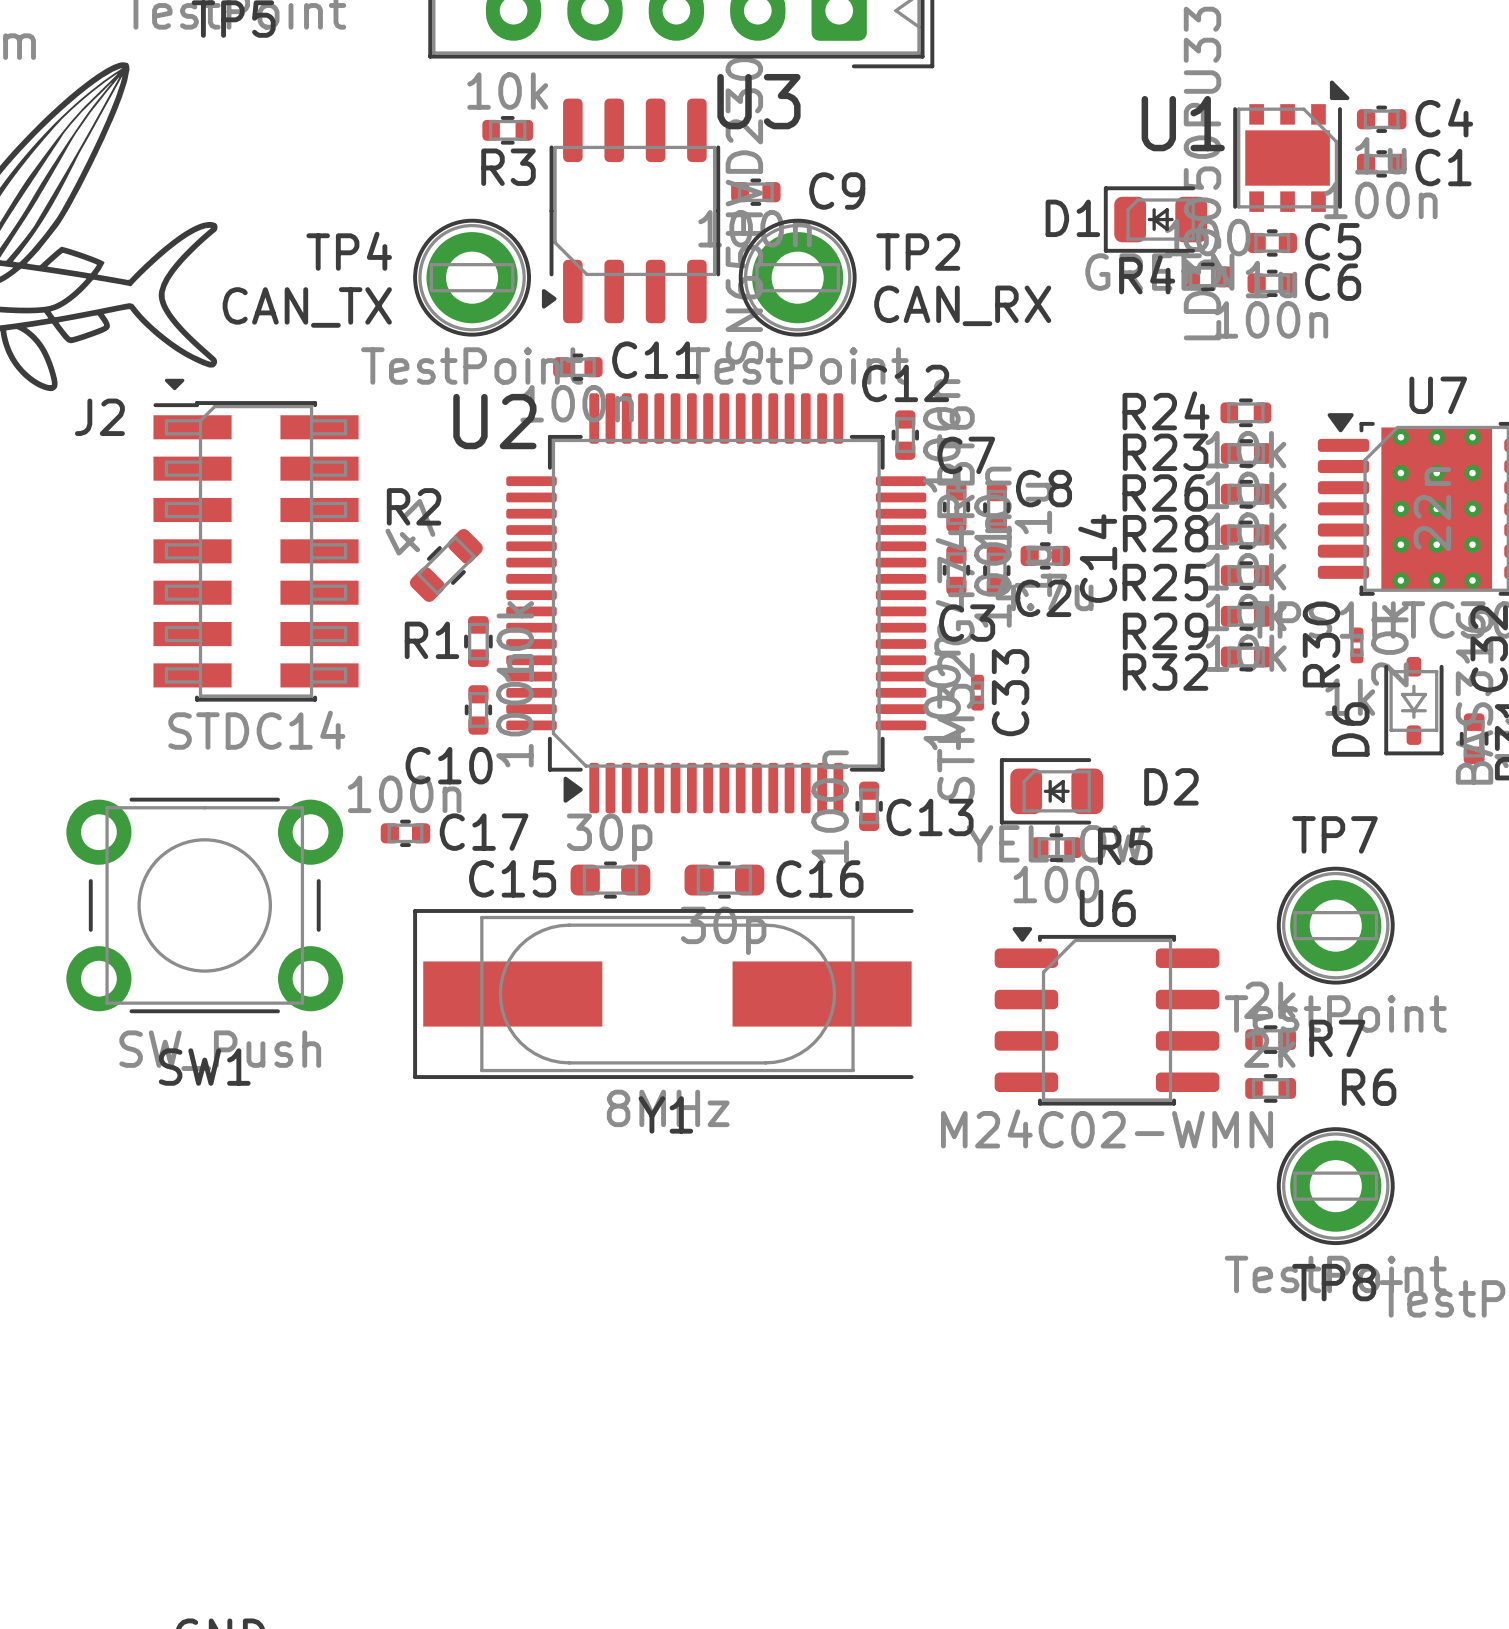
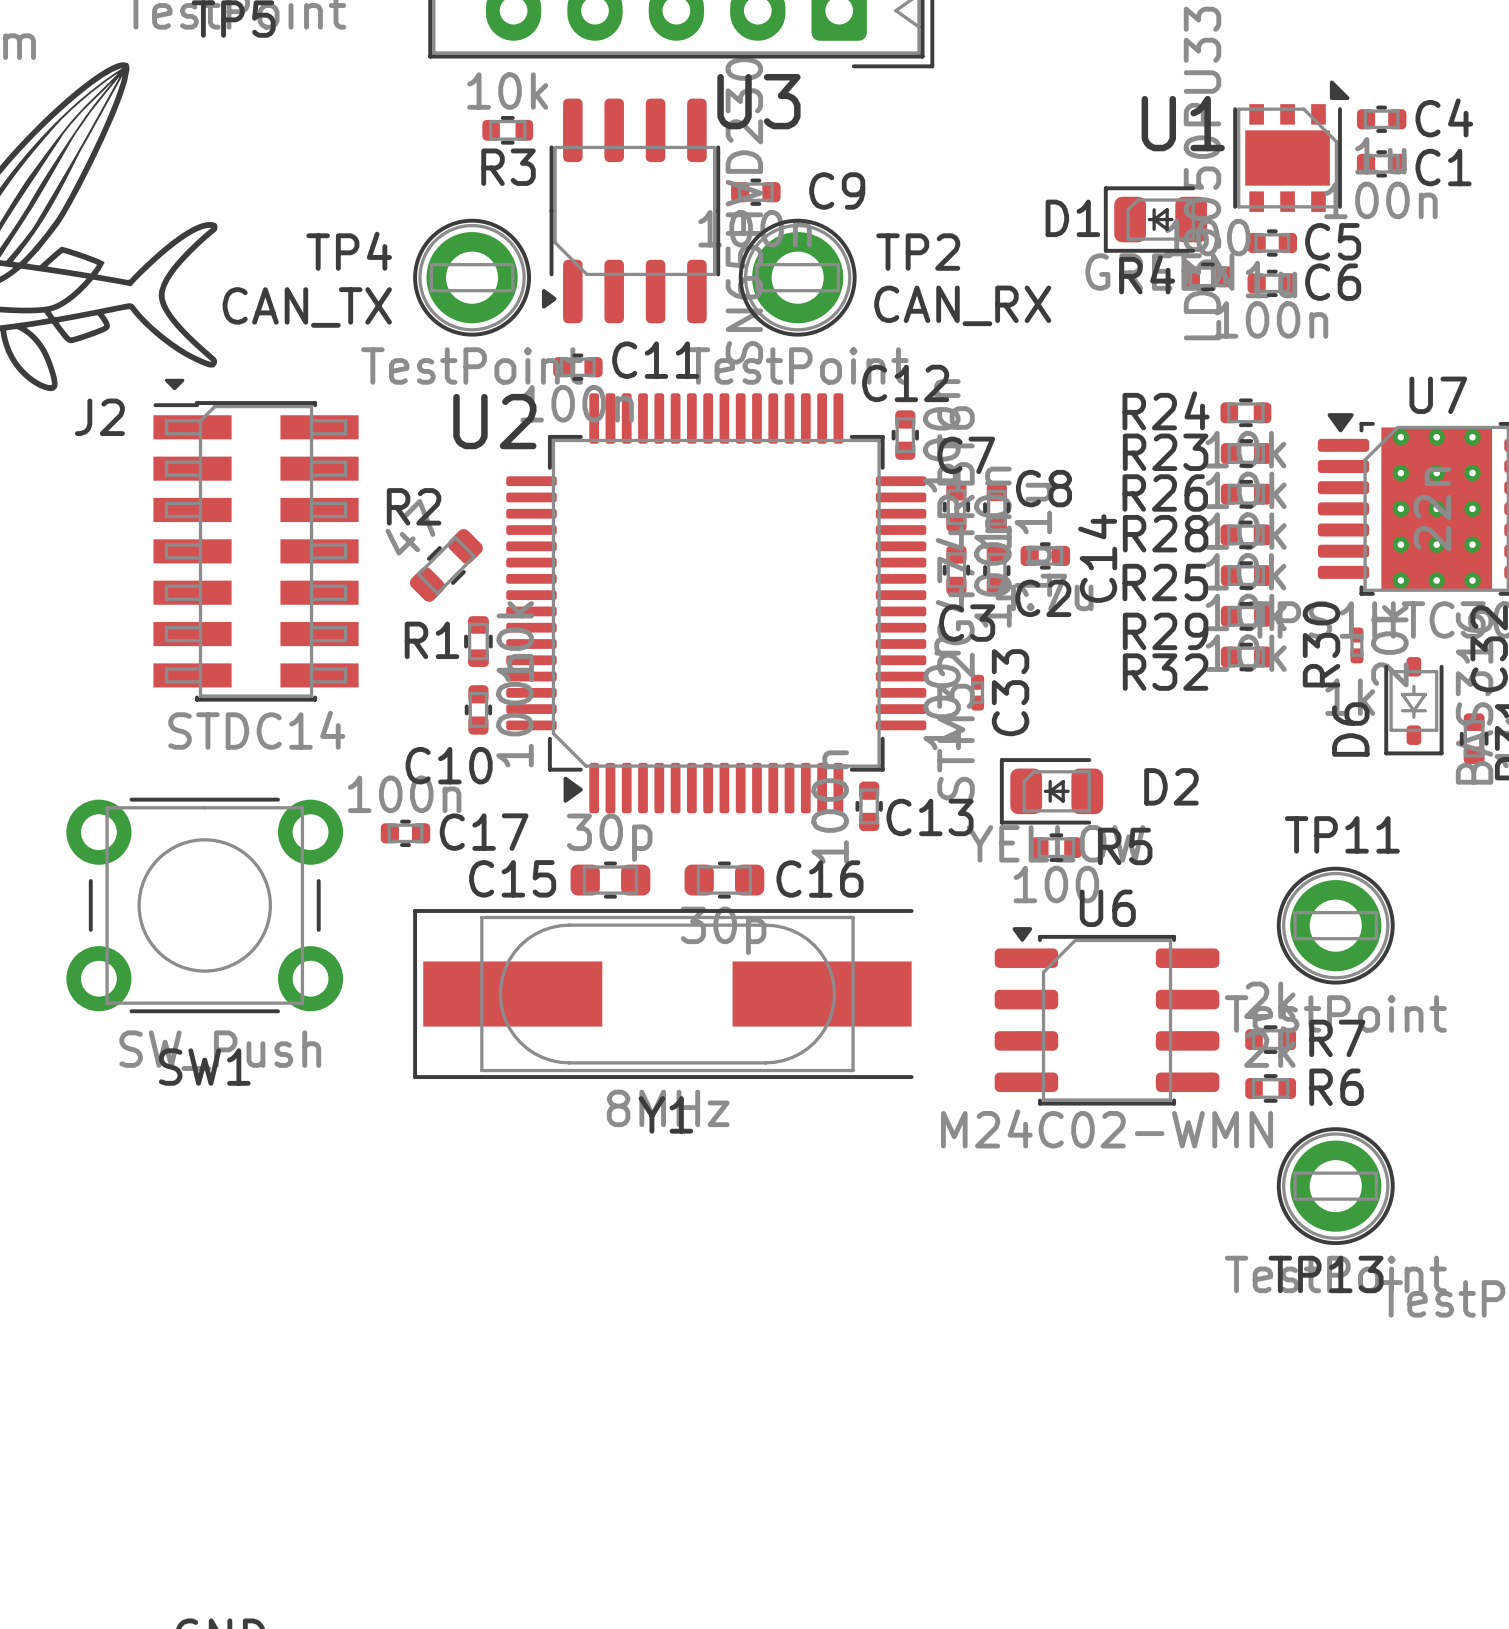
TP7 name: TP7 (1334, 834) -> TP11 (1342, 834)
R6 name position: R6 (1369, 1087) -> R6 (1336, 1087)
TP8 name: TP8 (1334, 1282) -> TP13 (1326, 1274)

